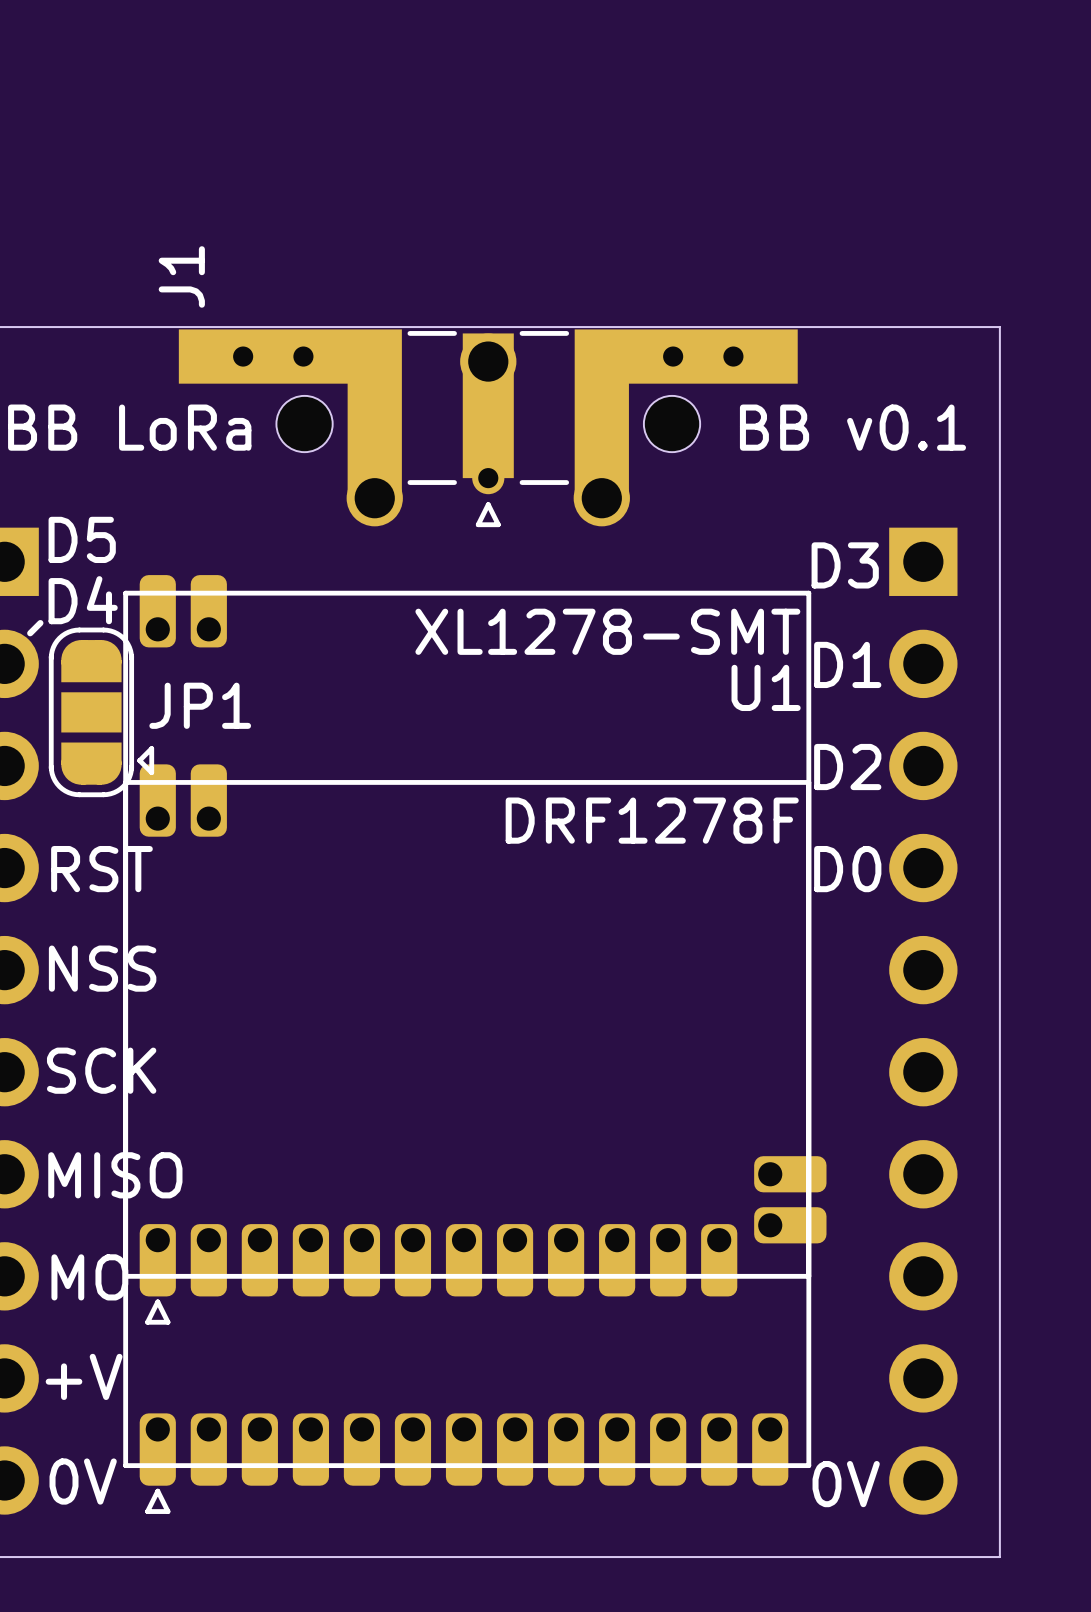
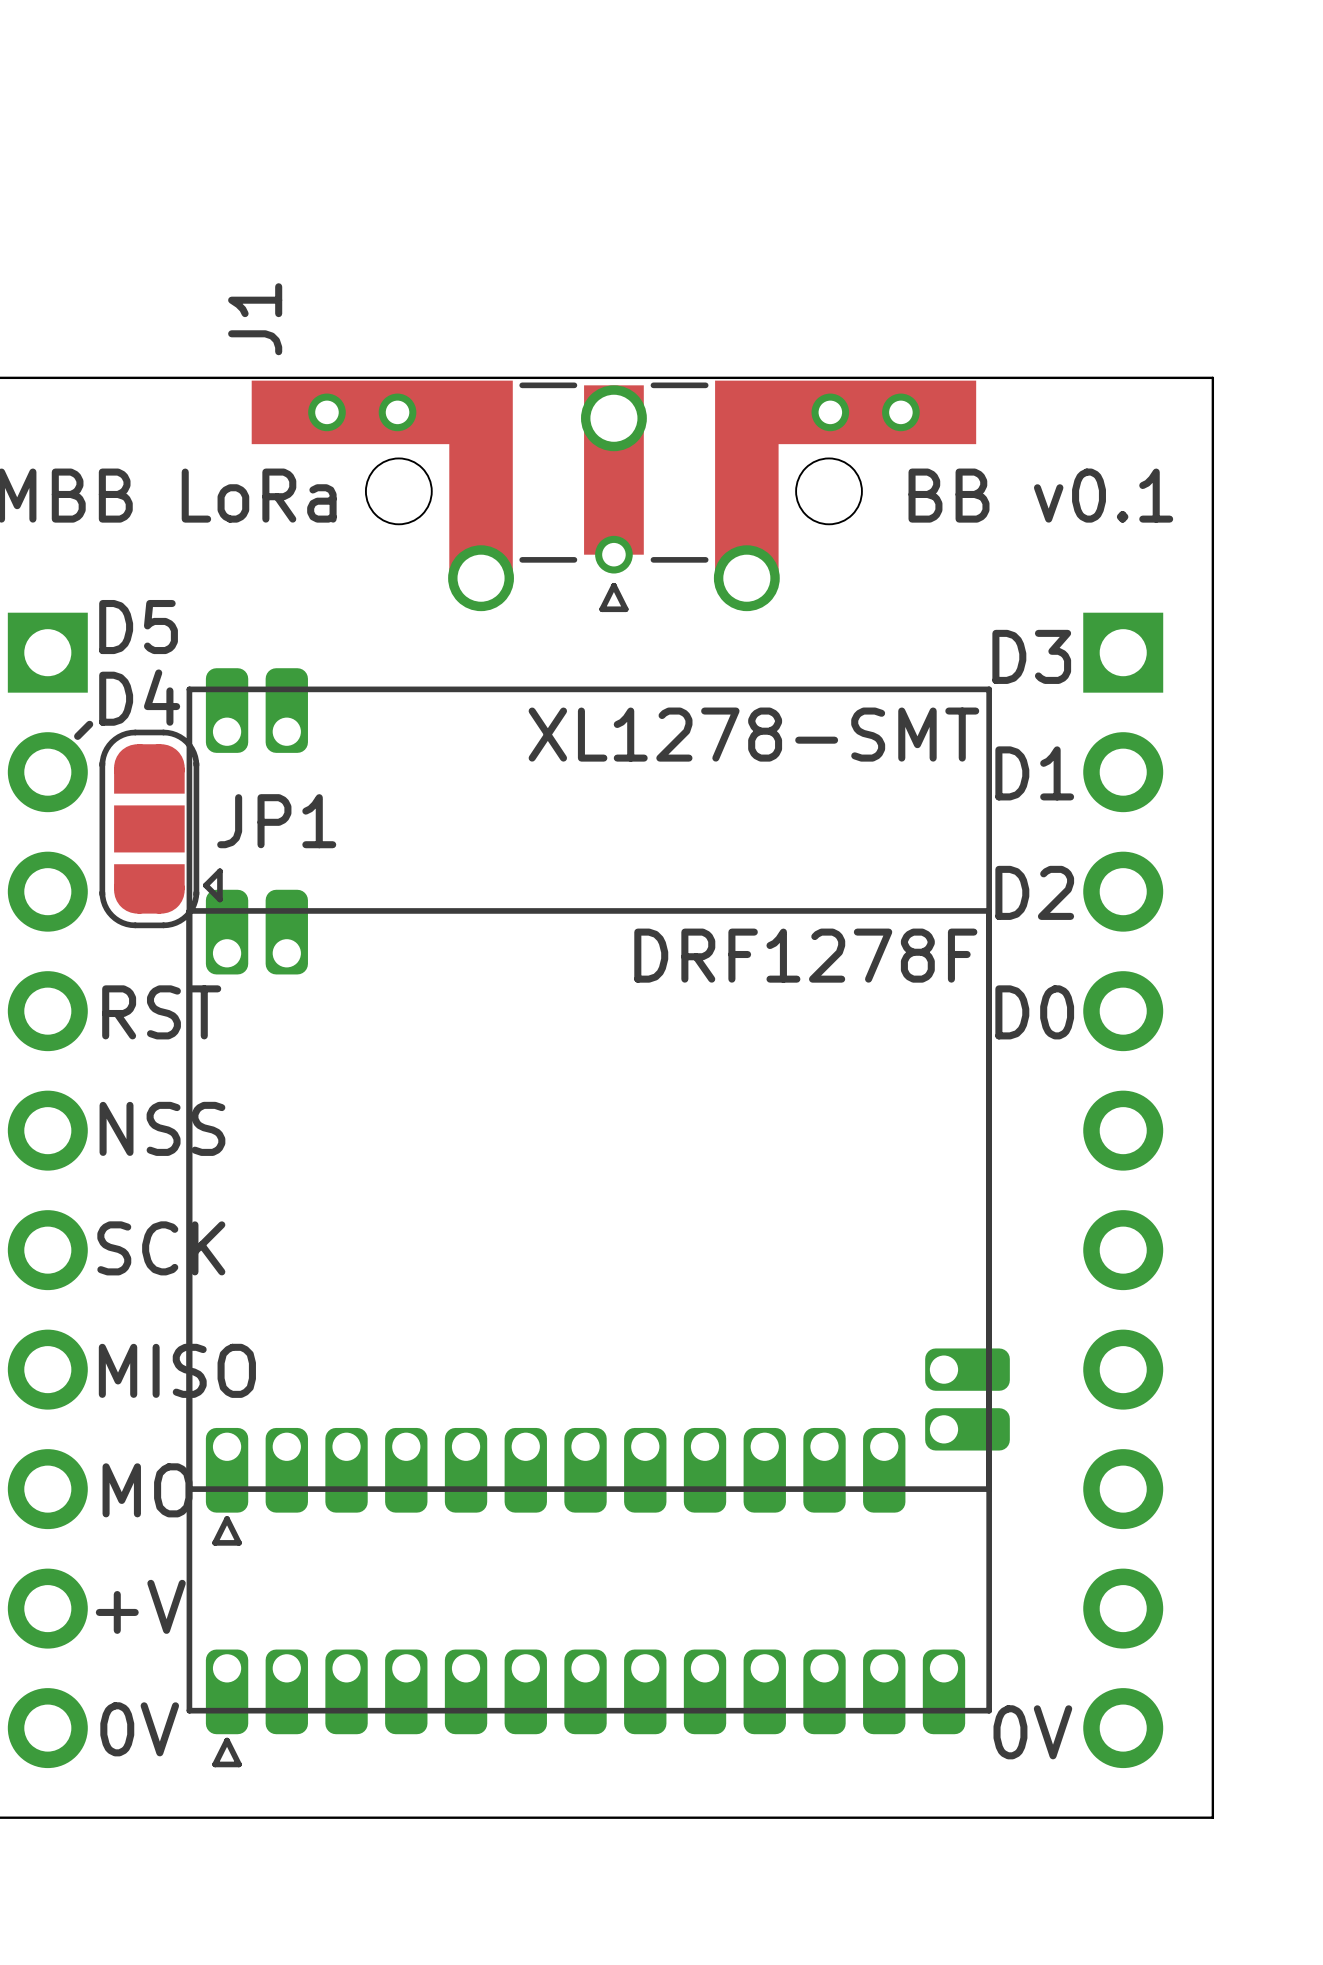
U1 name: U1 (766, 687) -> none

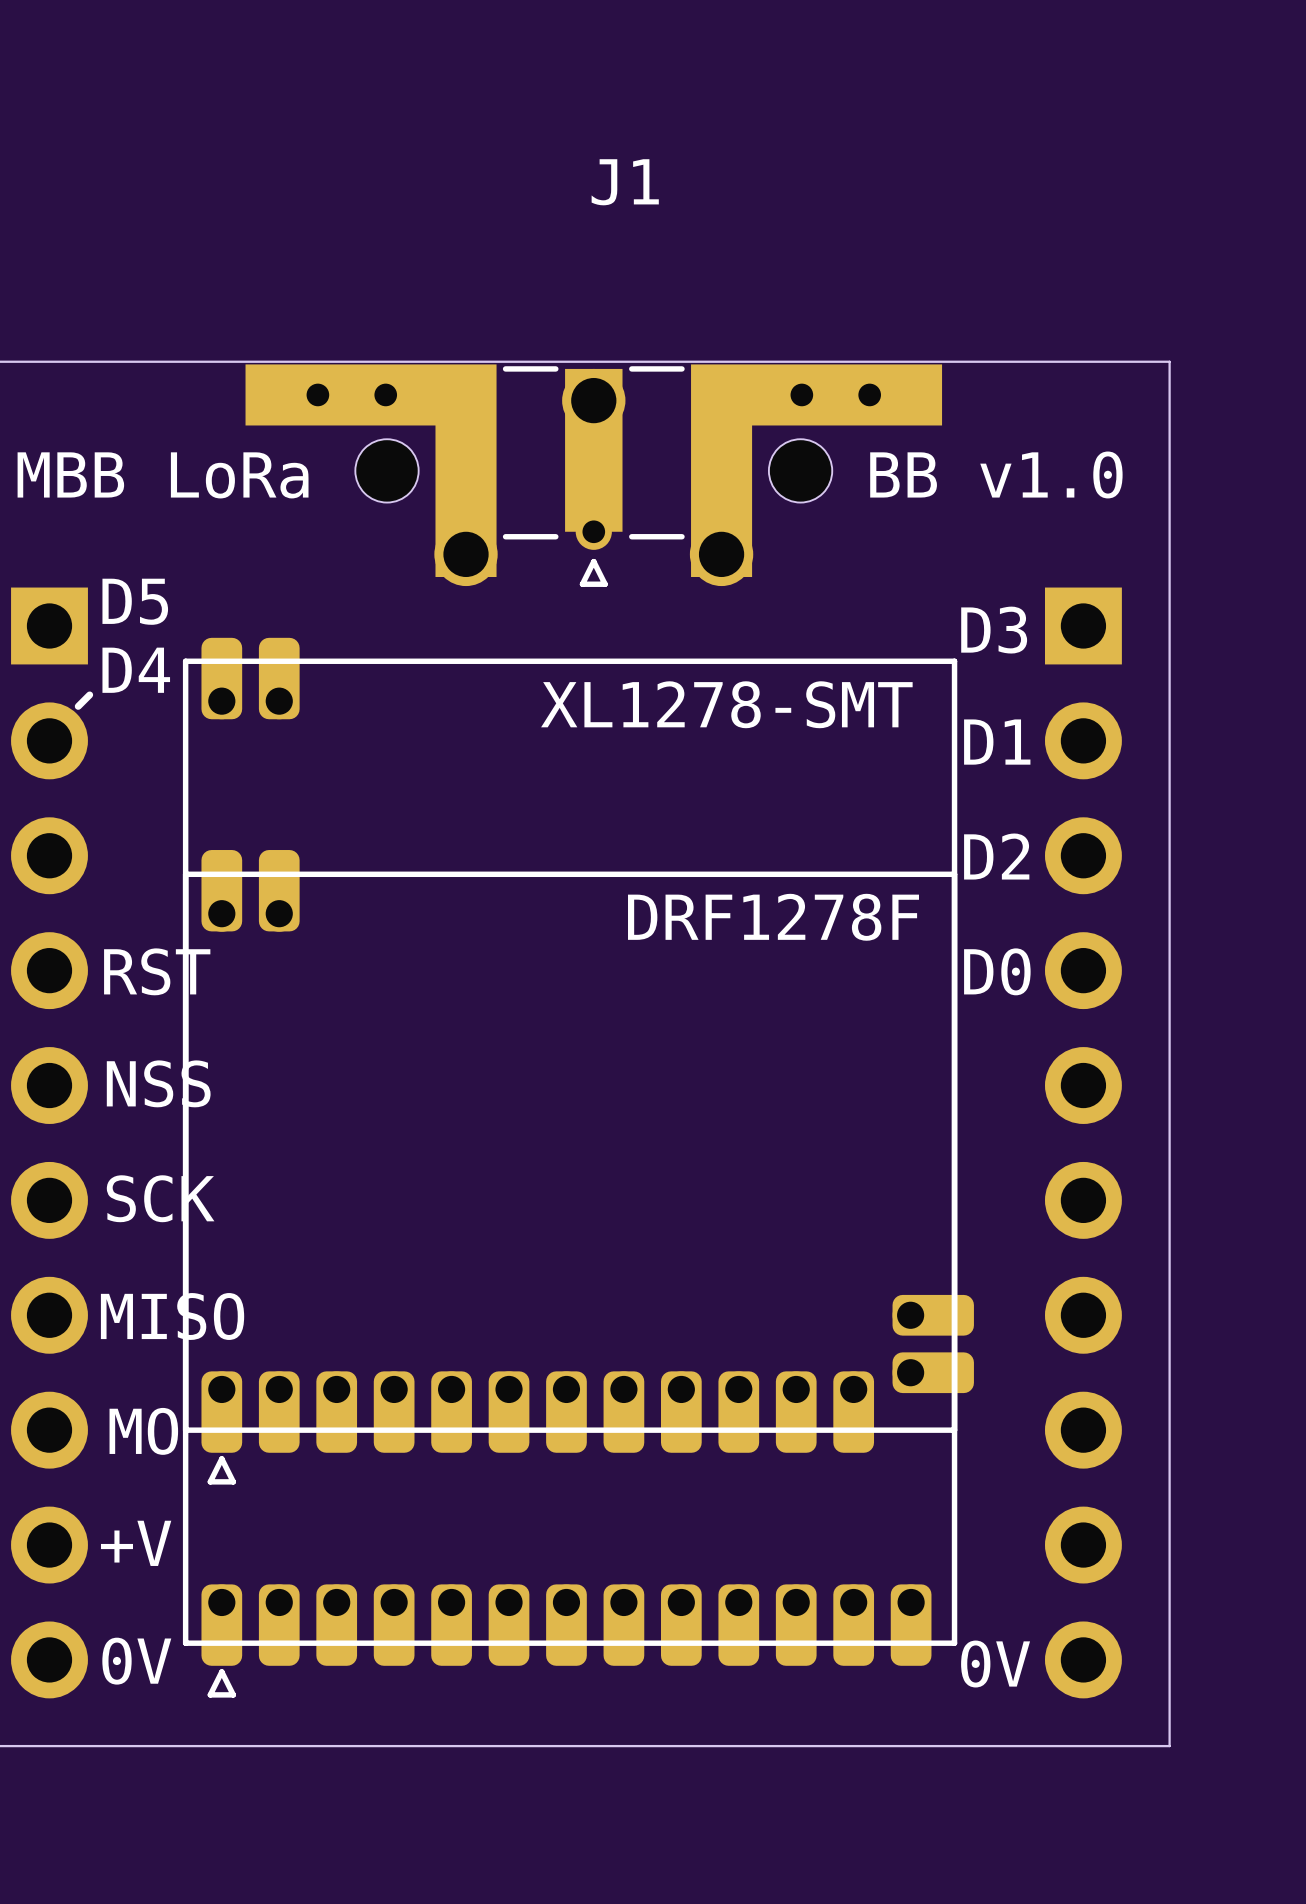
J1 name rotation: 0° (255, 319) -> 90° clockwise (625, 182)
J1 name position: J1 (255, 319) -> J1 (625, 182)
J1 footprint: [251, 380, 977, 613] -> [245, 364, 943, 587]
text: BB v0.1 (1040, 495) -> BB v1.0 (996, 474)
part footprint: [186, 668, 1010, 1546] -> [182, 637, 974, 1485]
JP1: (161, 828) -> none
part footprint: [186, 889, 992, 1768] -> [182, 850, 958, 1698]

